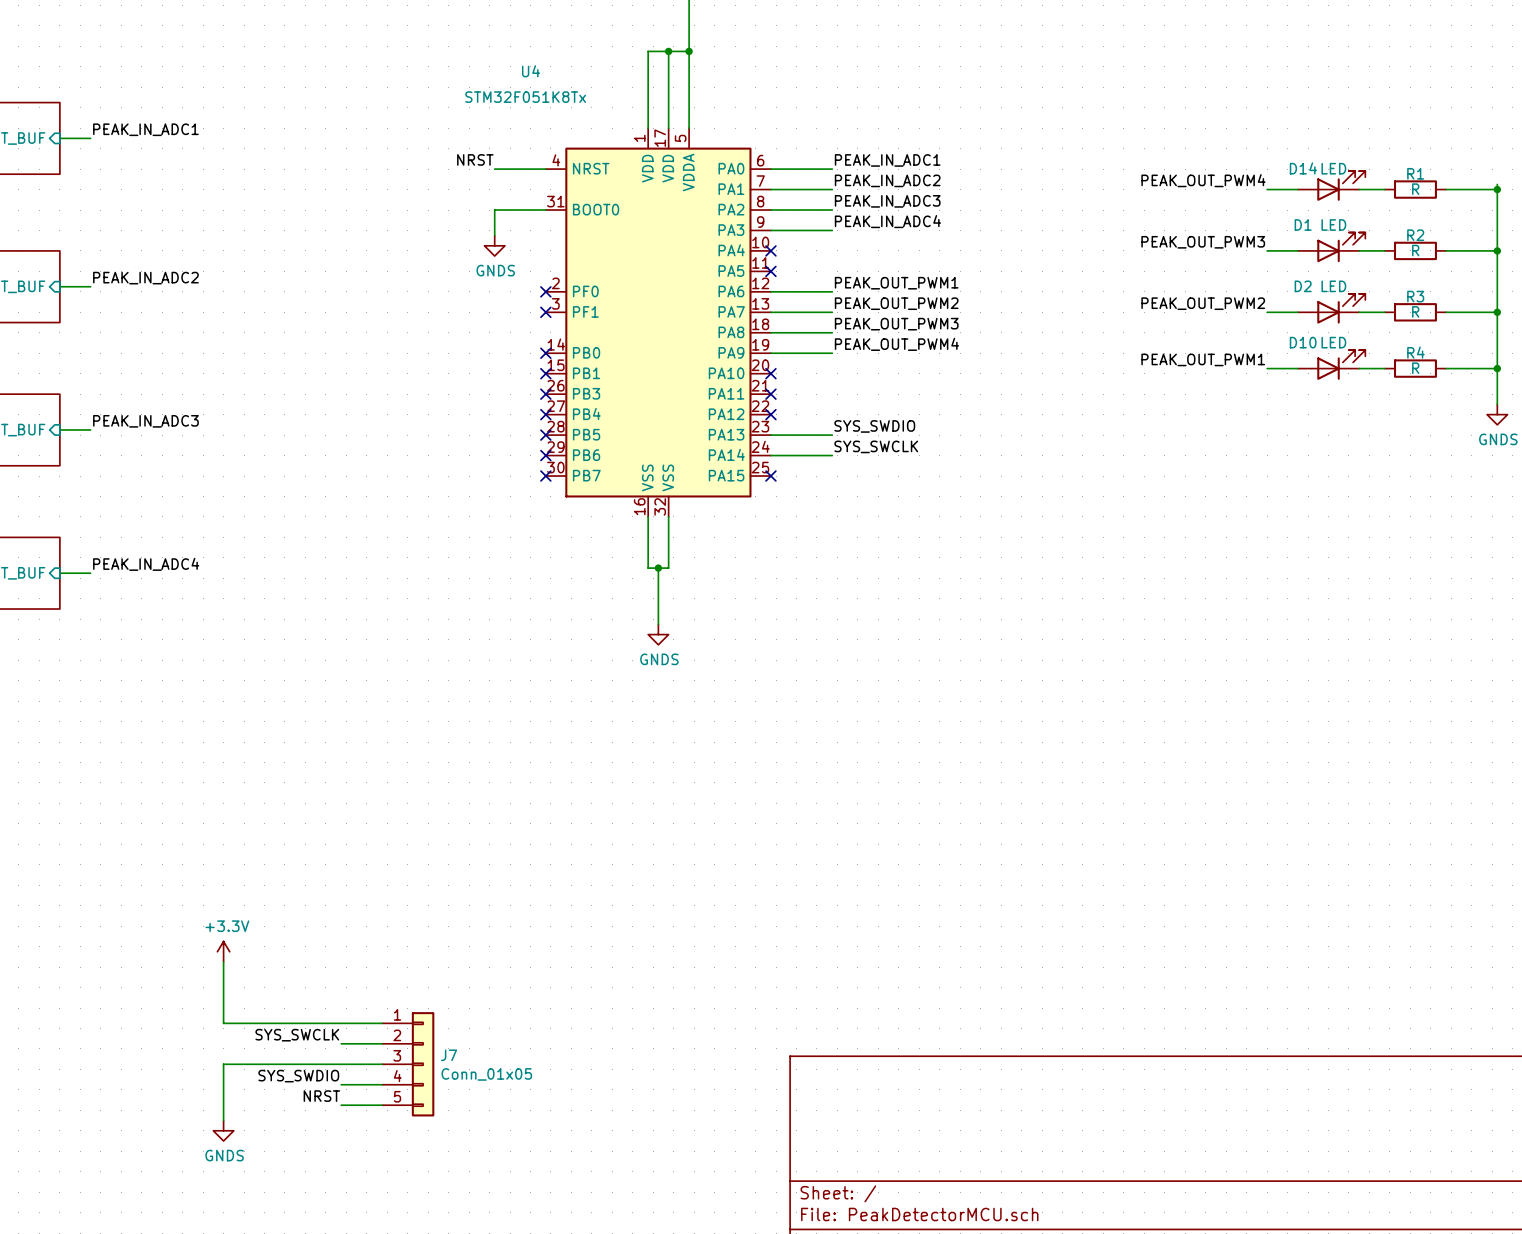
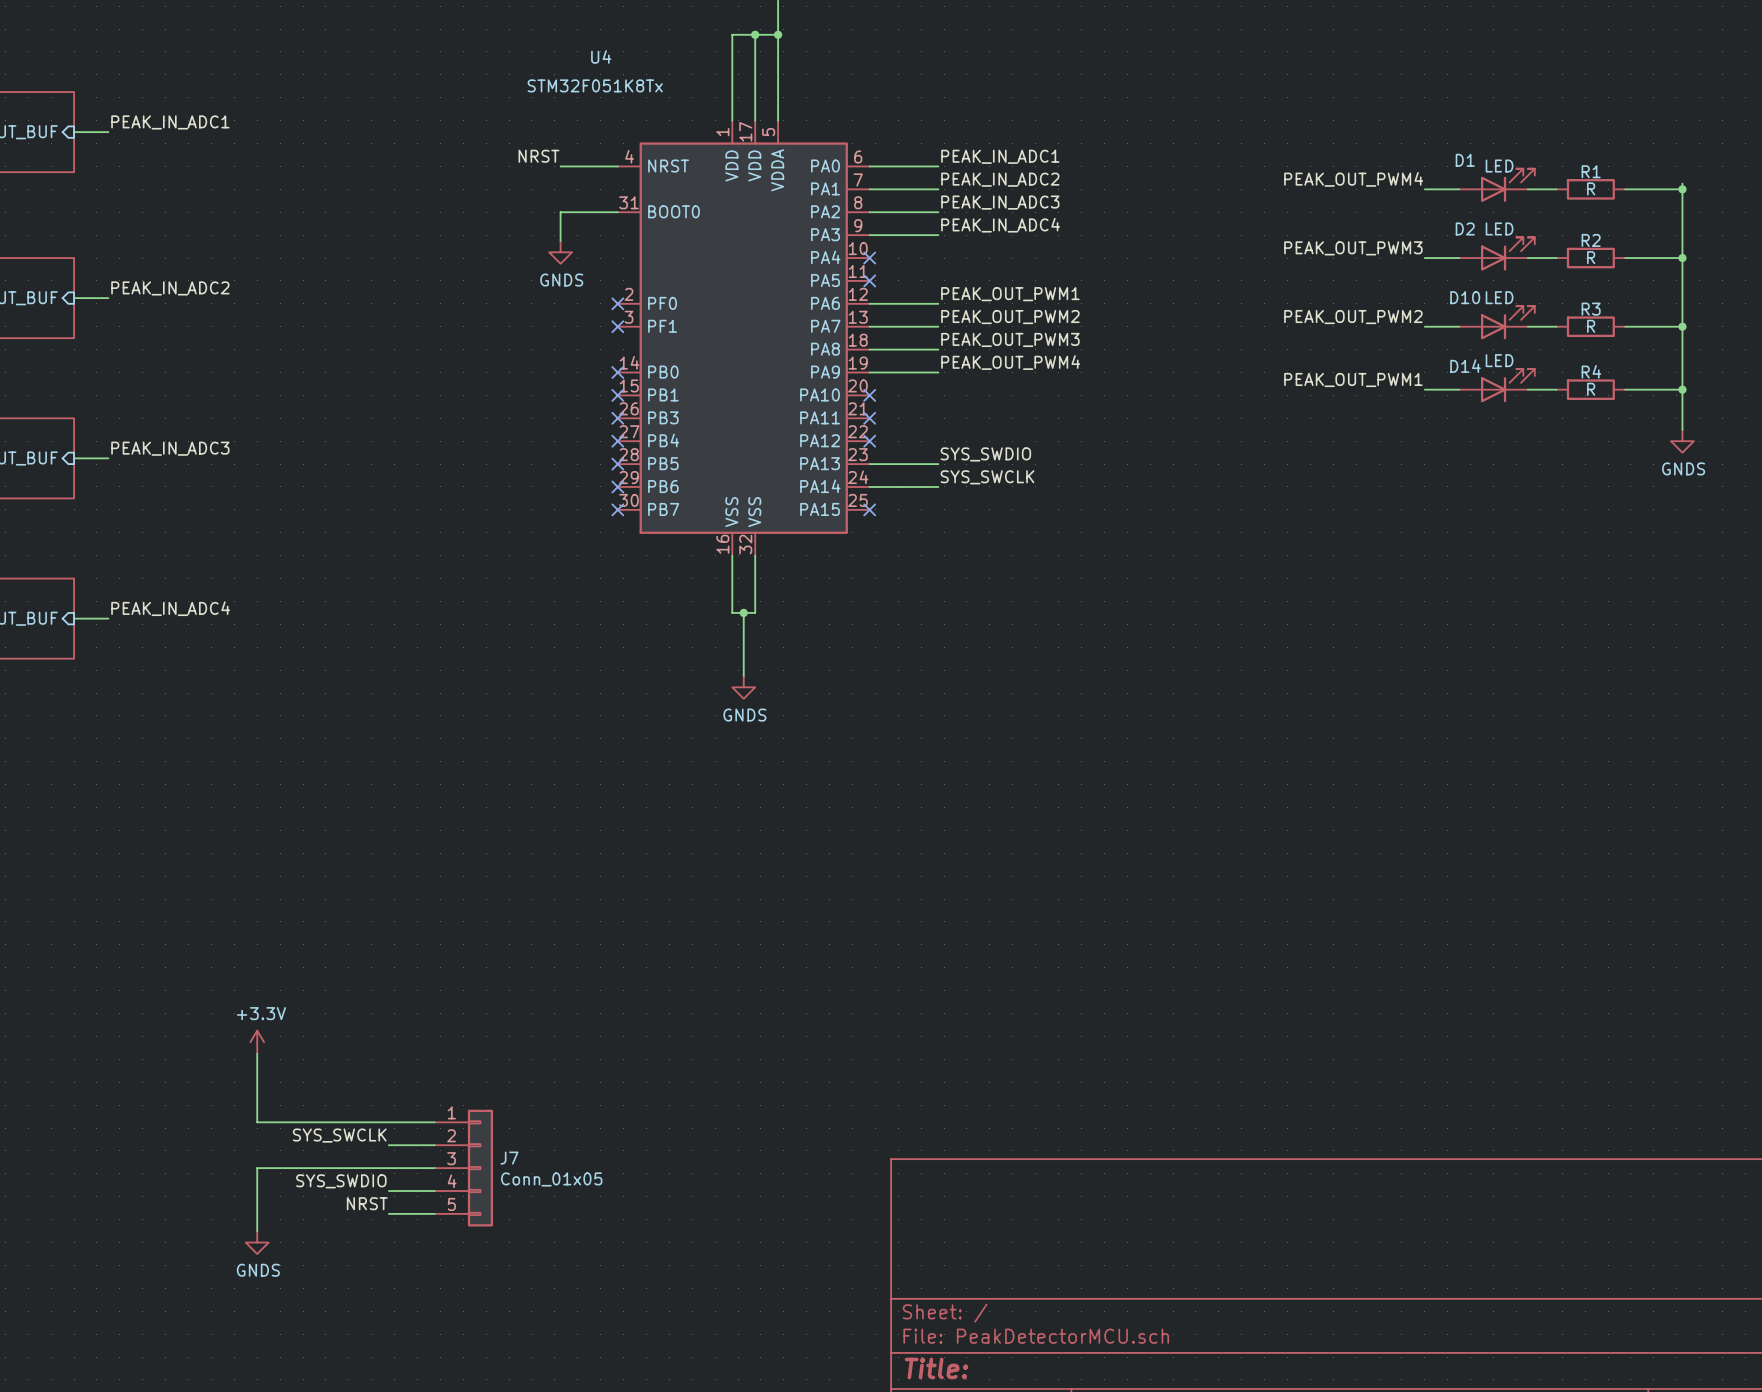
D14 name: D14 (1303, 168) -> D1 (1465, 160)
D1 name: D1 (1303, 224) -> D2 (1465, 228)
D2 name: D2 (1303, 286) -> D10 (1465, 297)
D10 name: D10 (1303, 342) -> D14 (1465, 366)

